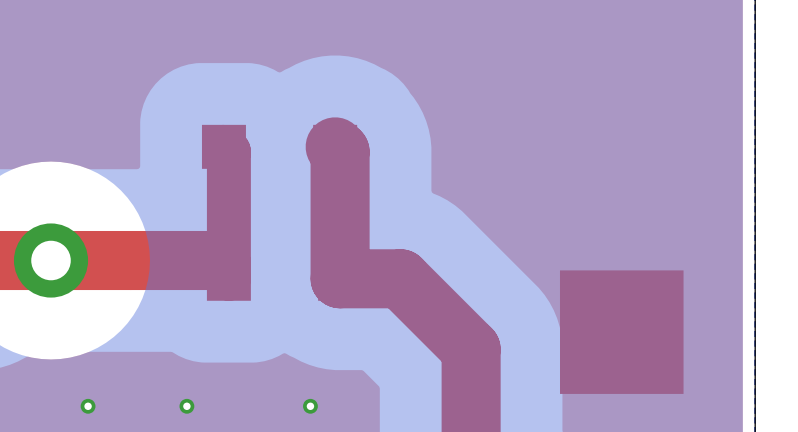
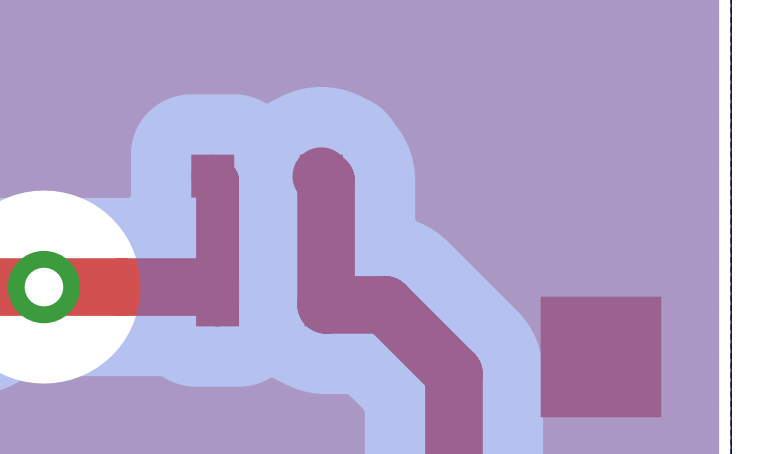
via: (88, 406) -> none
via: (186, 406) -> none
via: (310, 406) -> none

